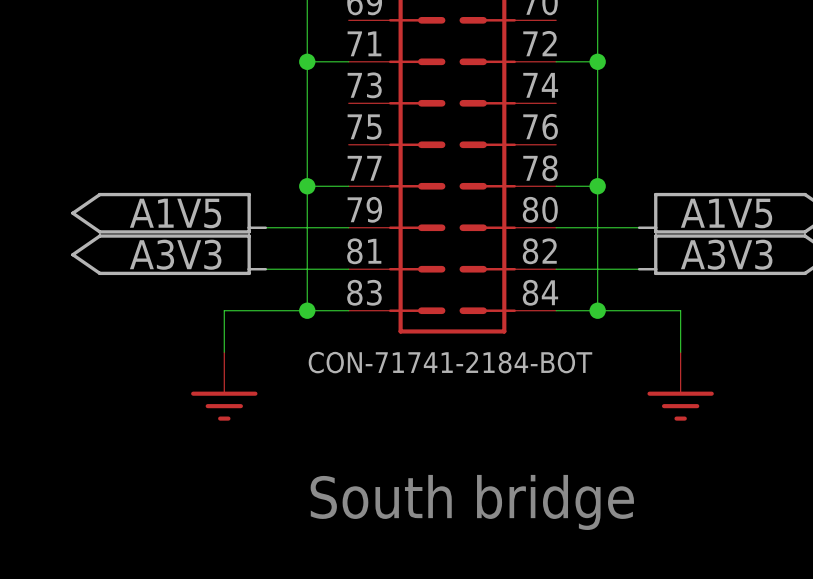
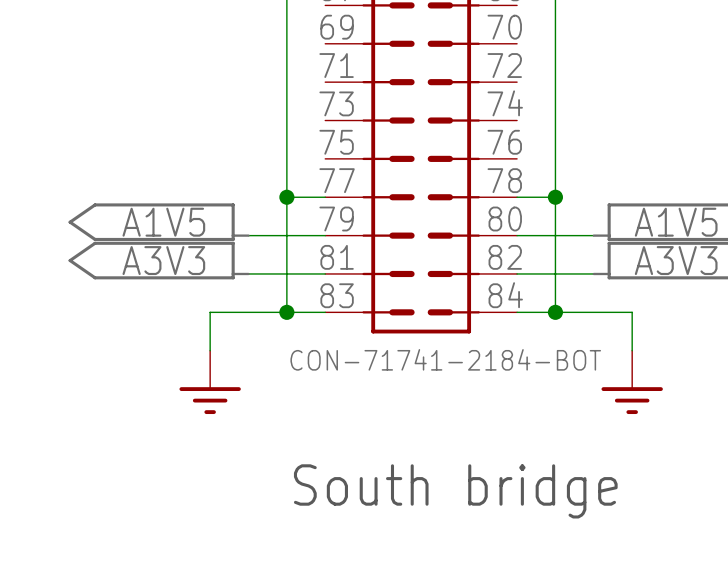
wire: (307, 61) (348, 61) -> none
junction: (307, 61) -> none
wire: (556, 61) (597, 61) -> none
junction: (597, 61) -> none

